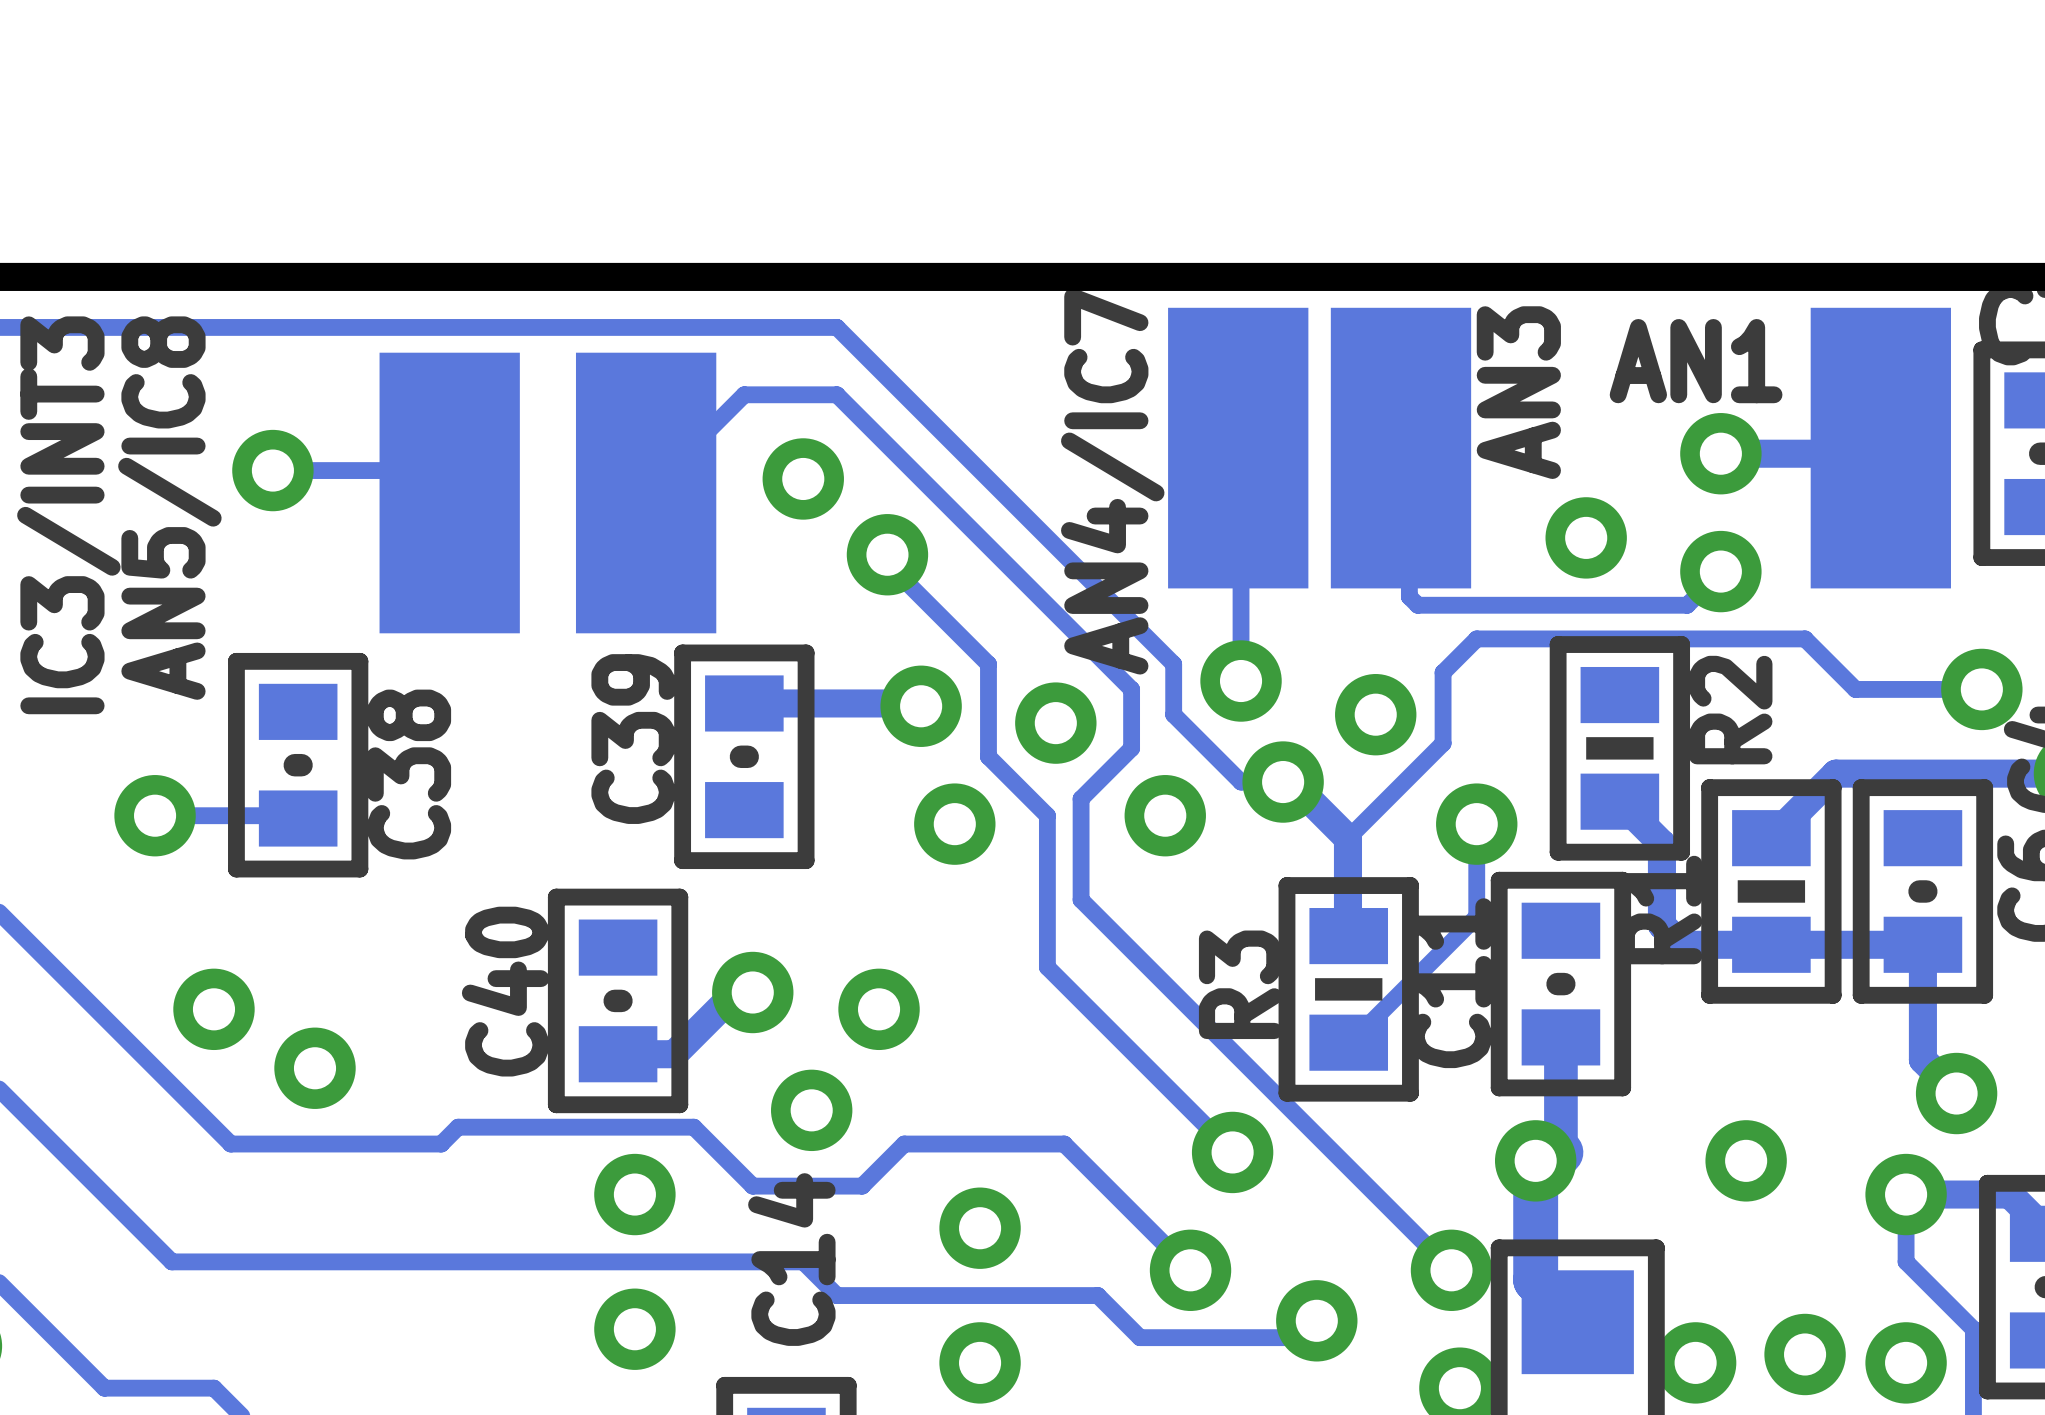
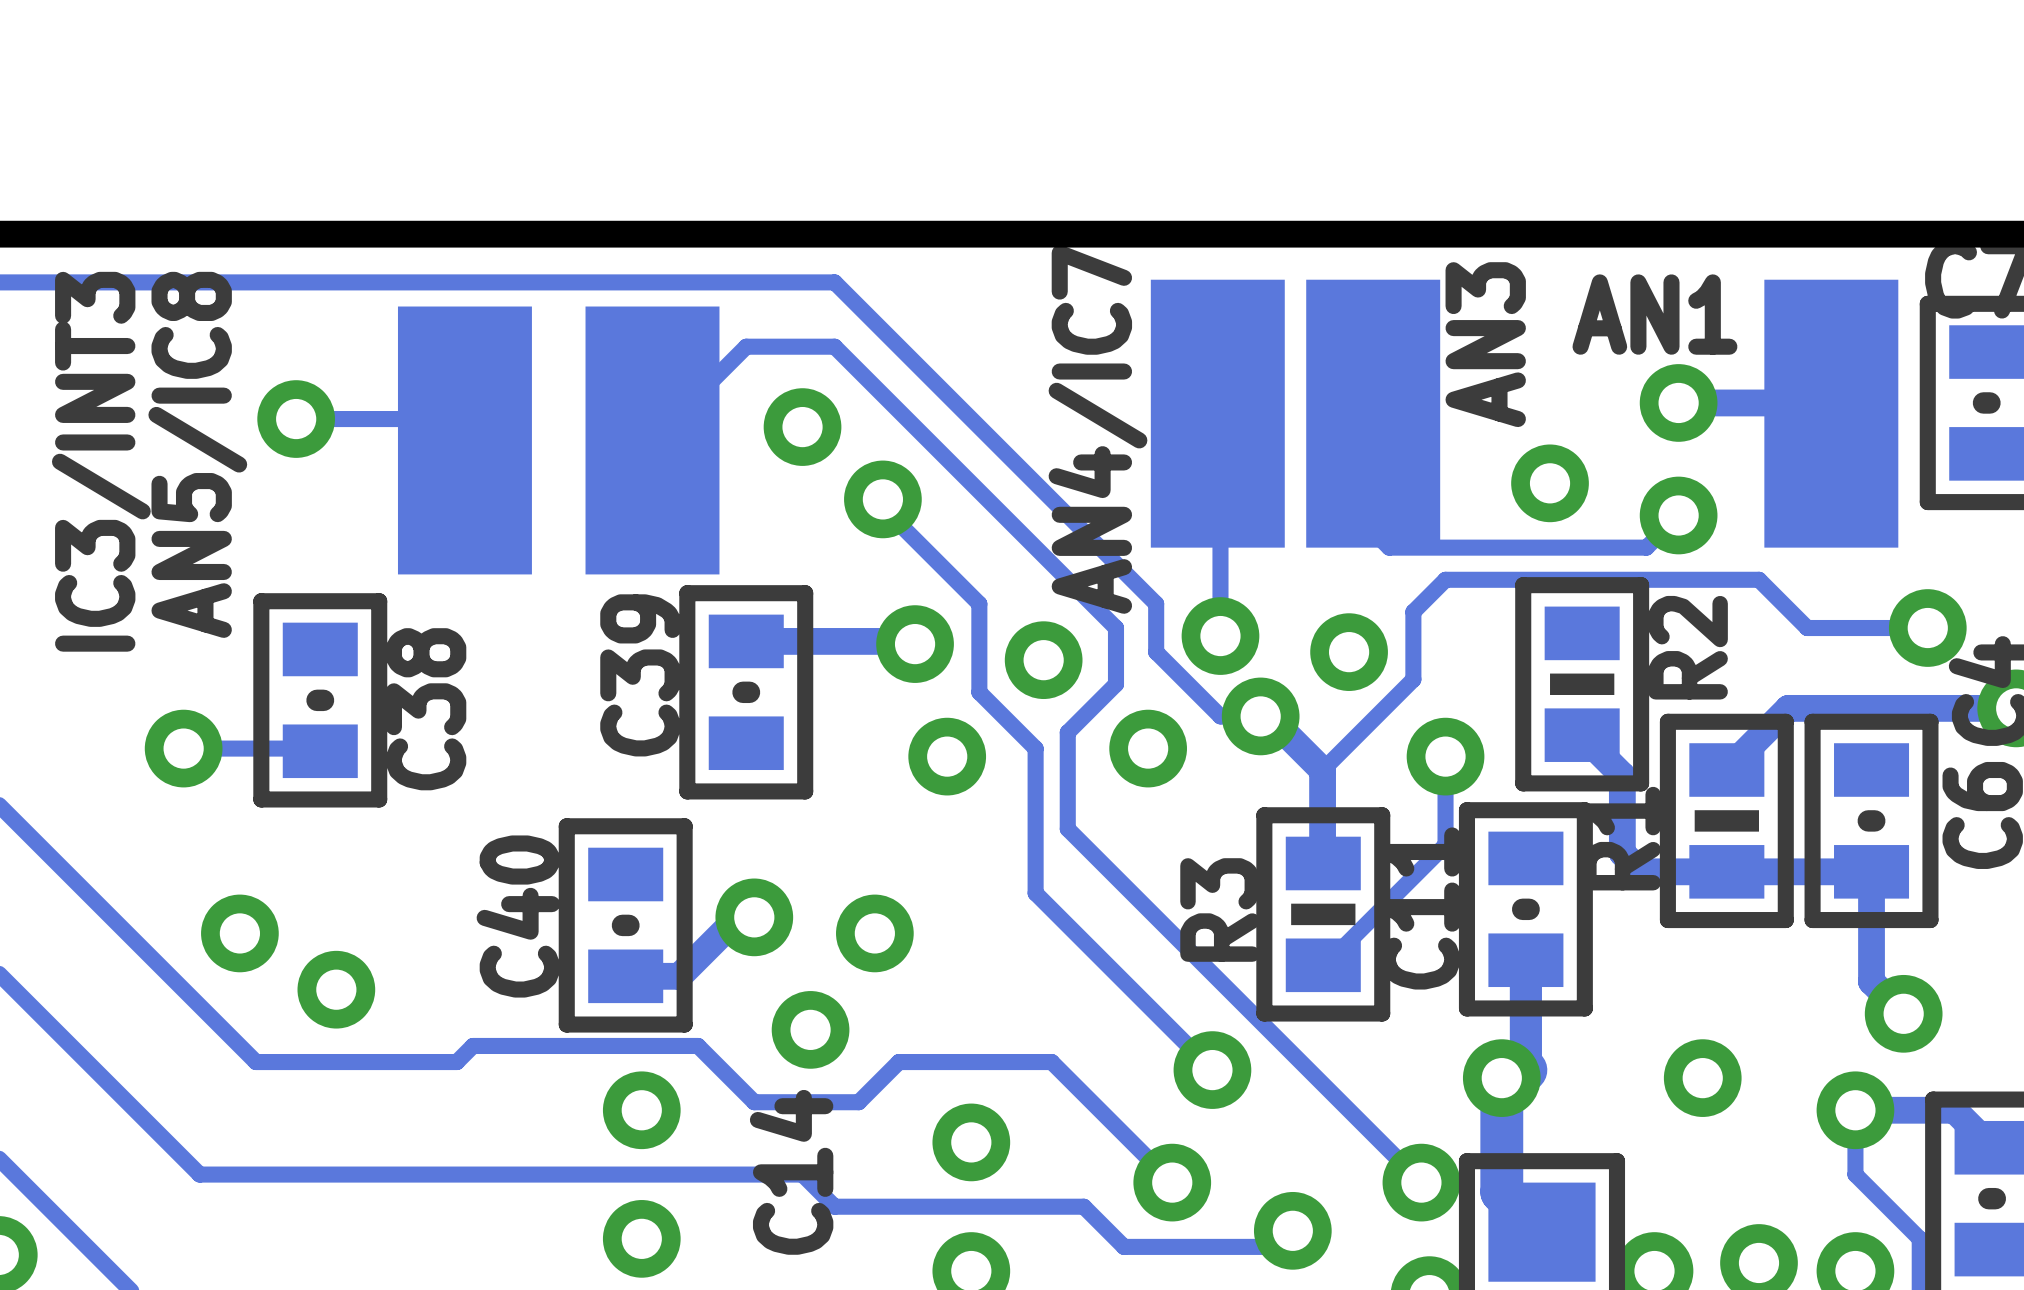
part position: (1238, 448) -> (1217, 413)
part position: (1400, 448) -> (1373, 413)
part position: (1880, 448) -> (1831, 413)
via position: (1241, 681) -> (1220, 636)

